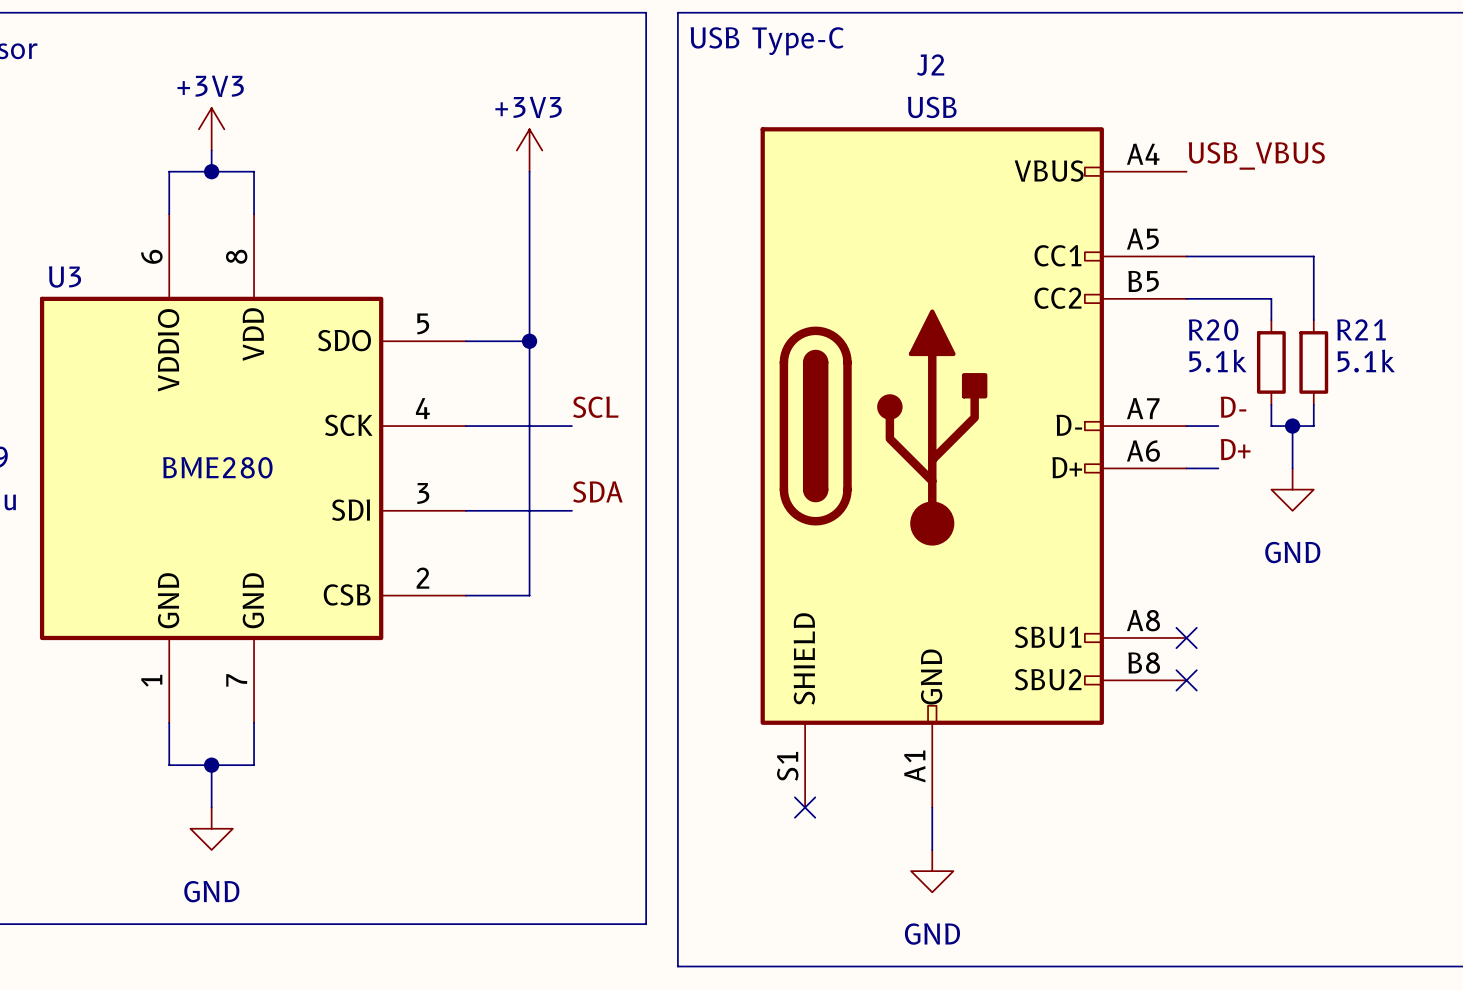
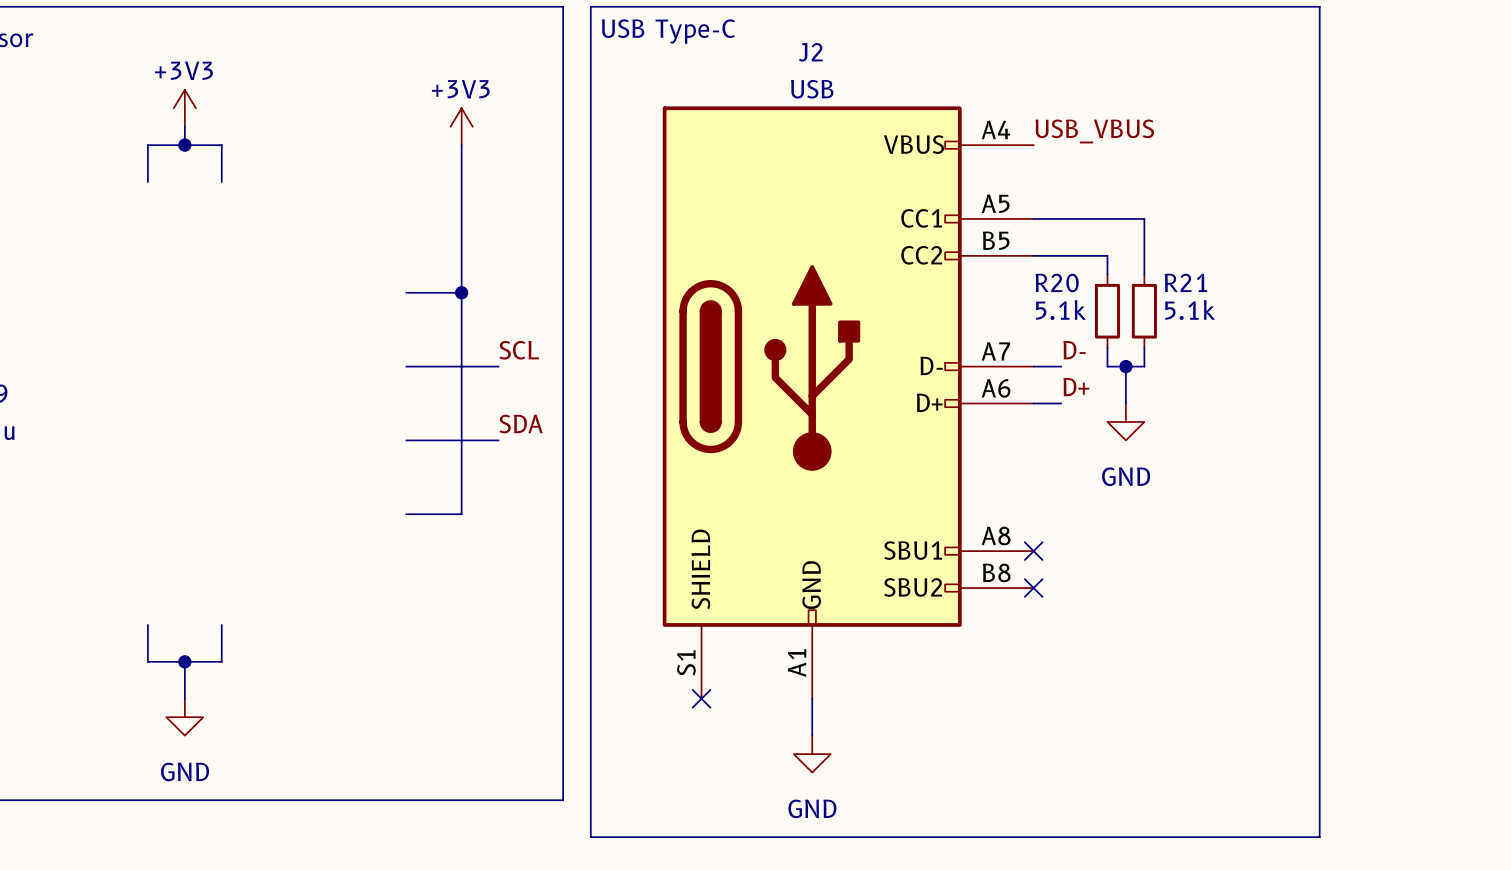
U3: BME280 (252, 468) -> none

